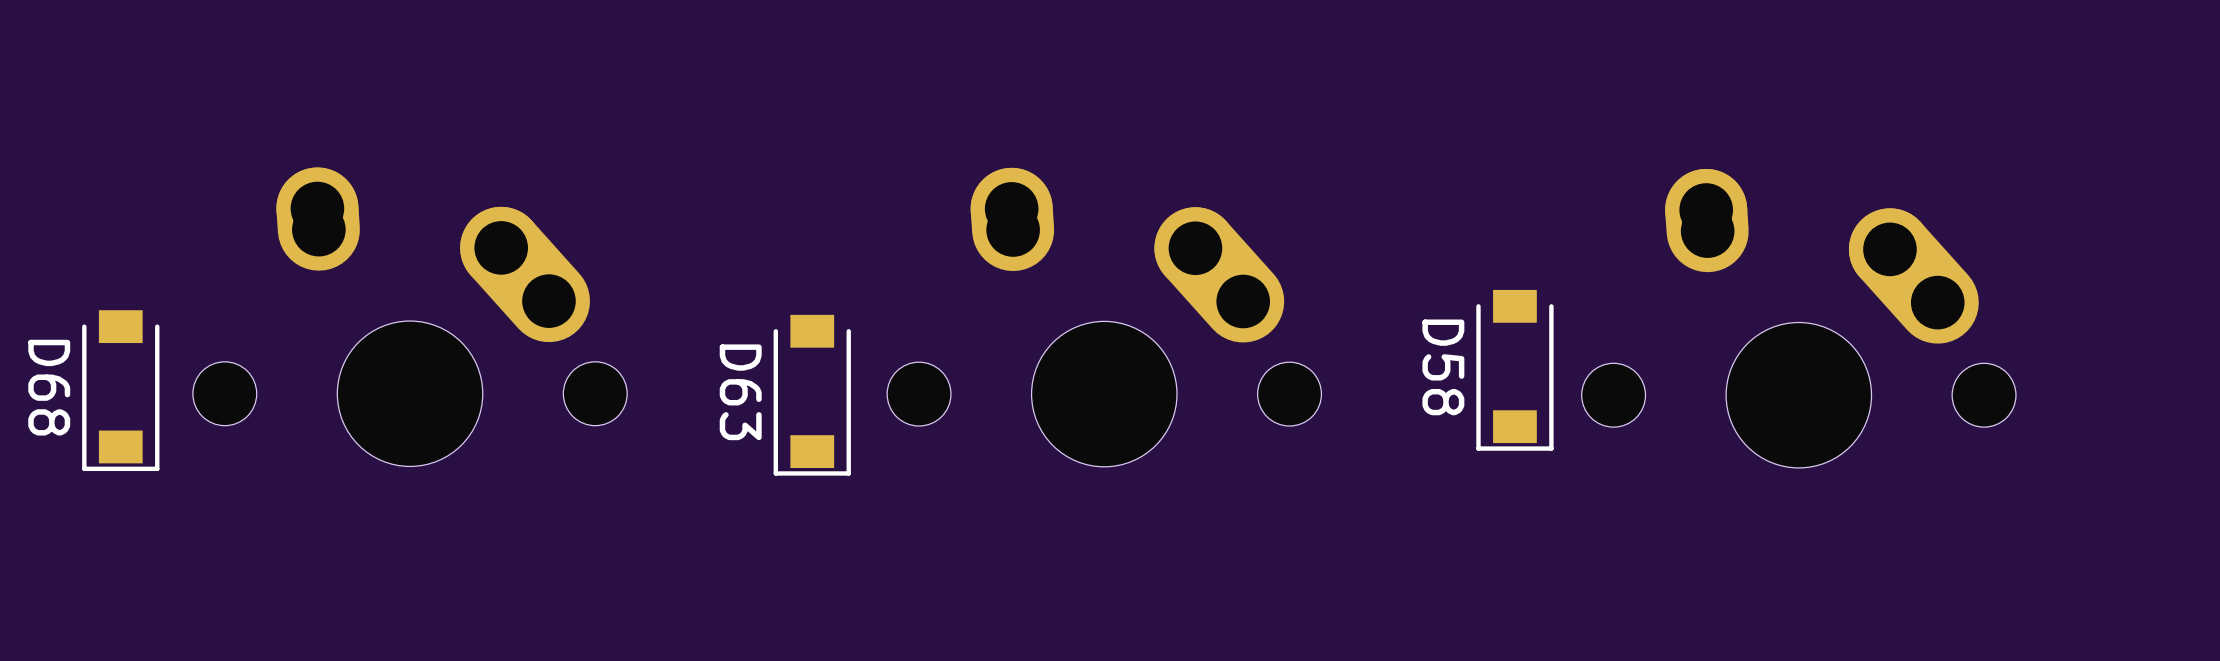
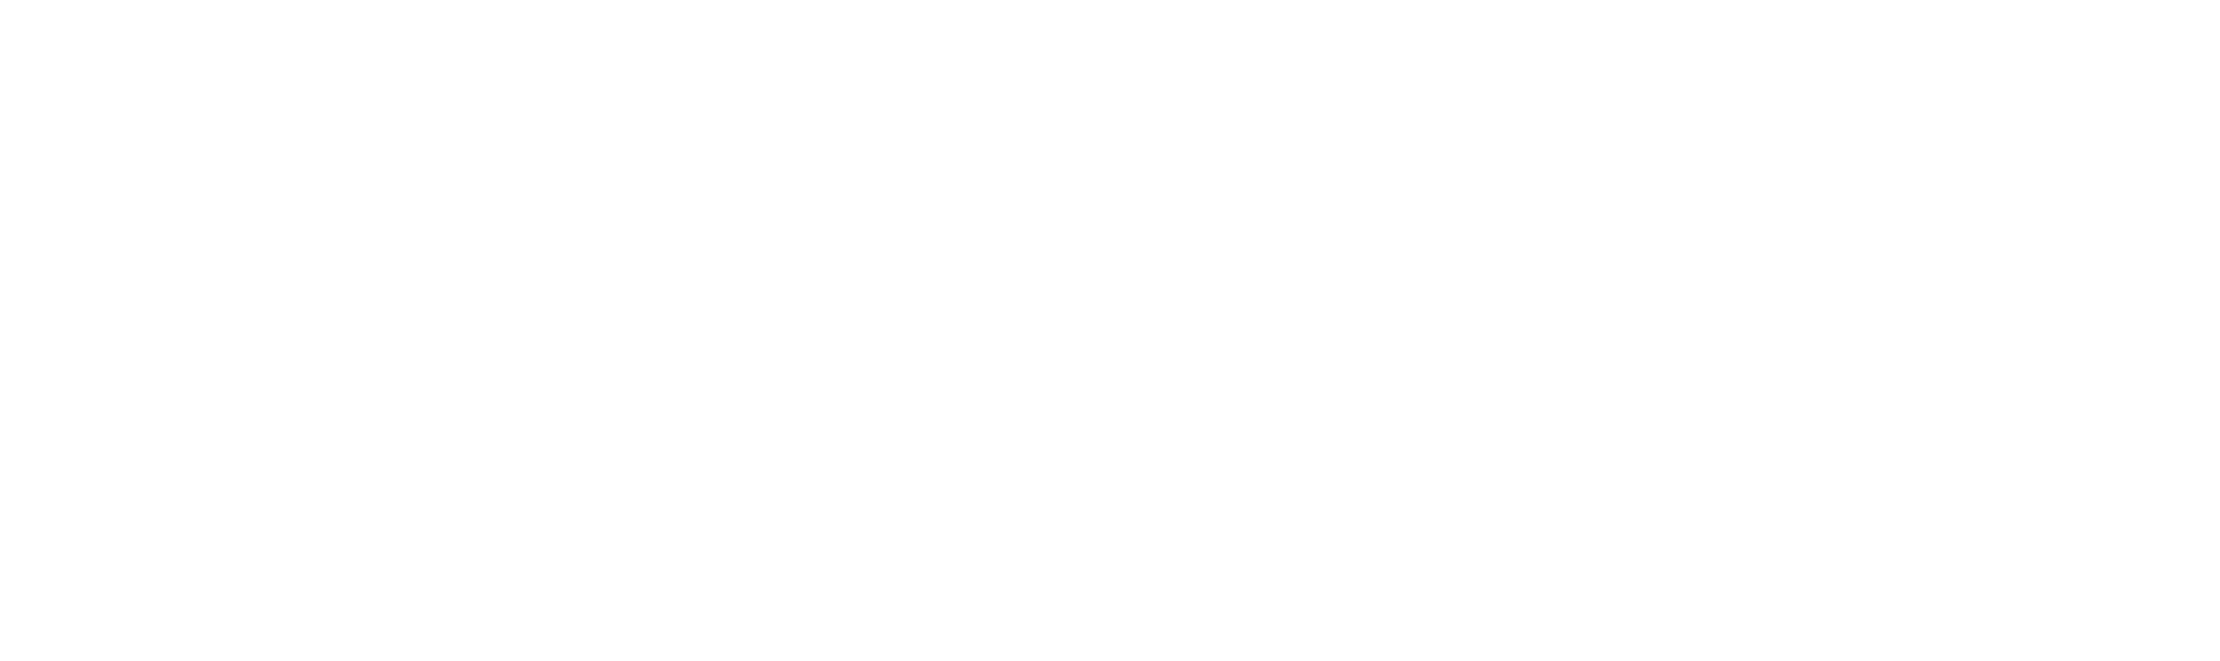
part: (410, 316) -> none
part: (1104, 317) -> none
part: (1798, 318) -> none
D58: (1514, 370) -> none
D68: (120, 390) -> none
D63: (812, 395) -> none

